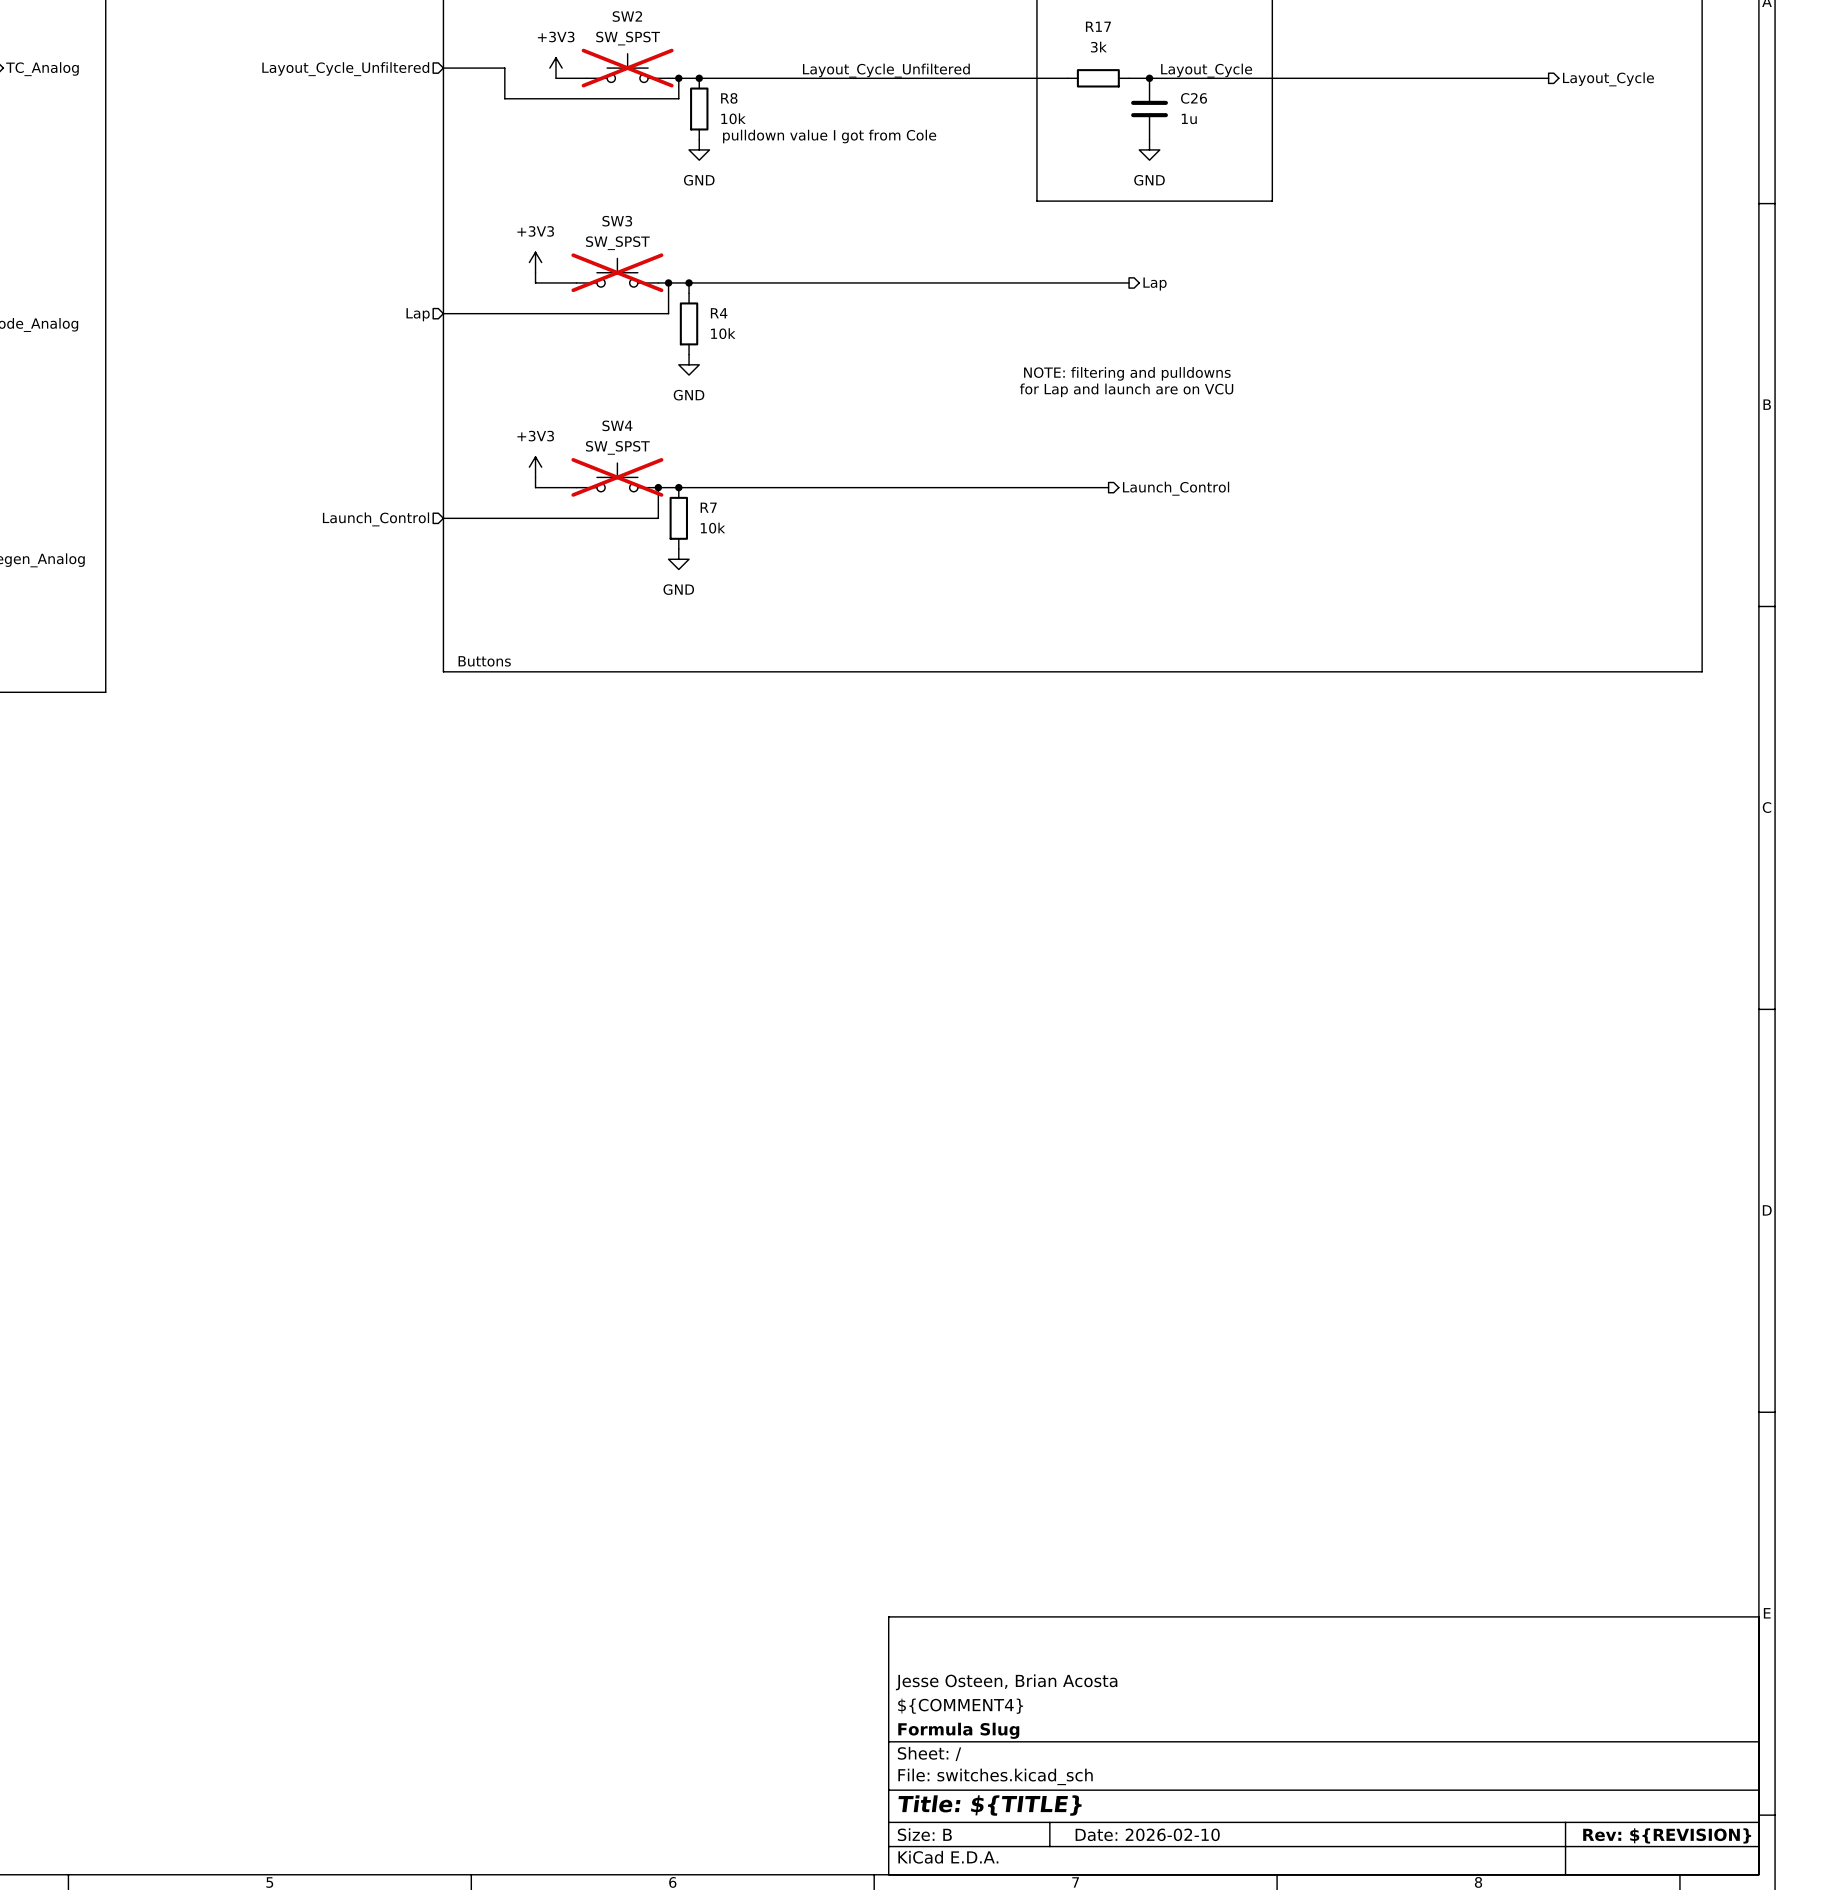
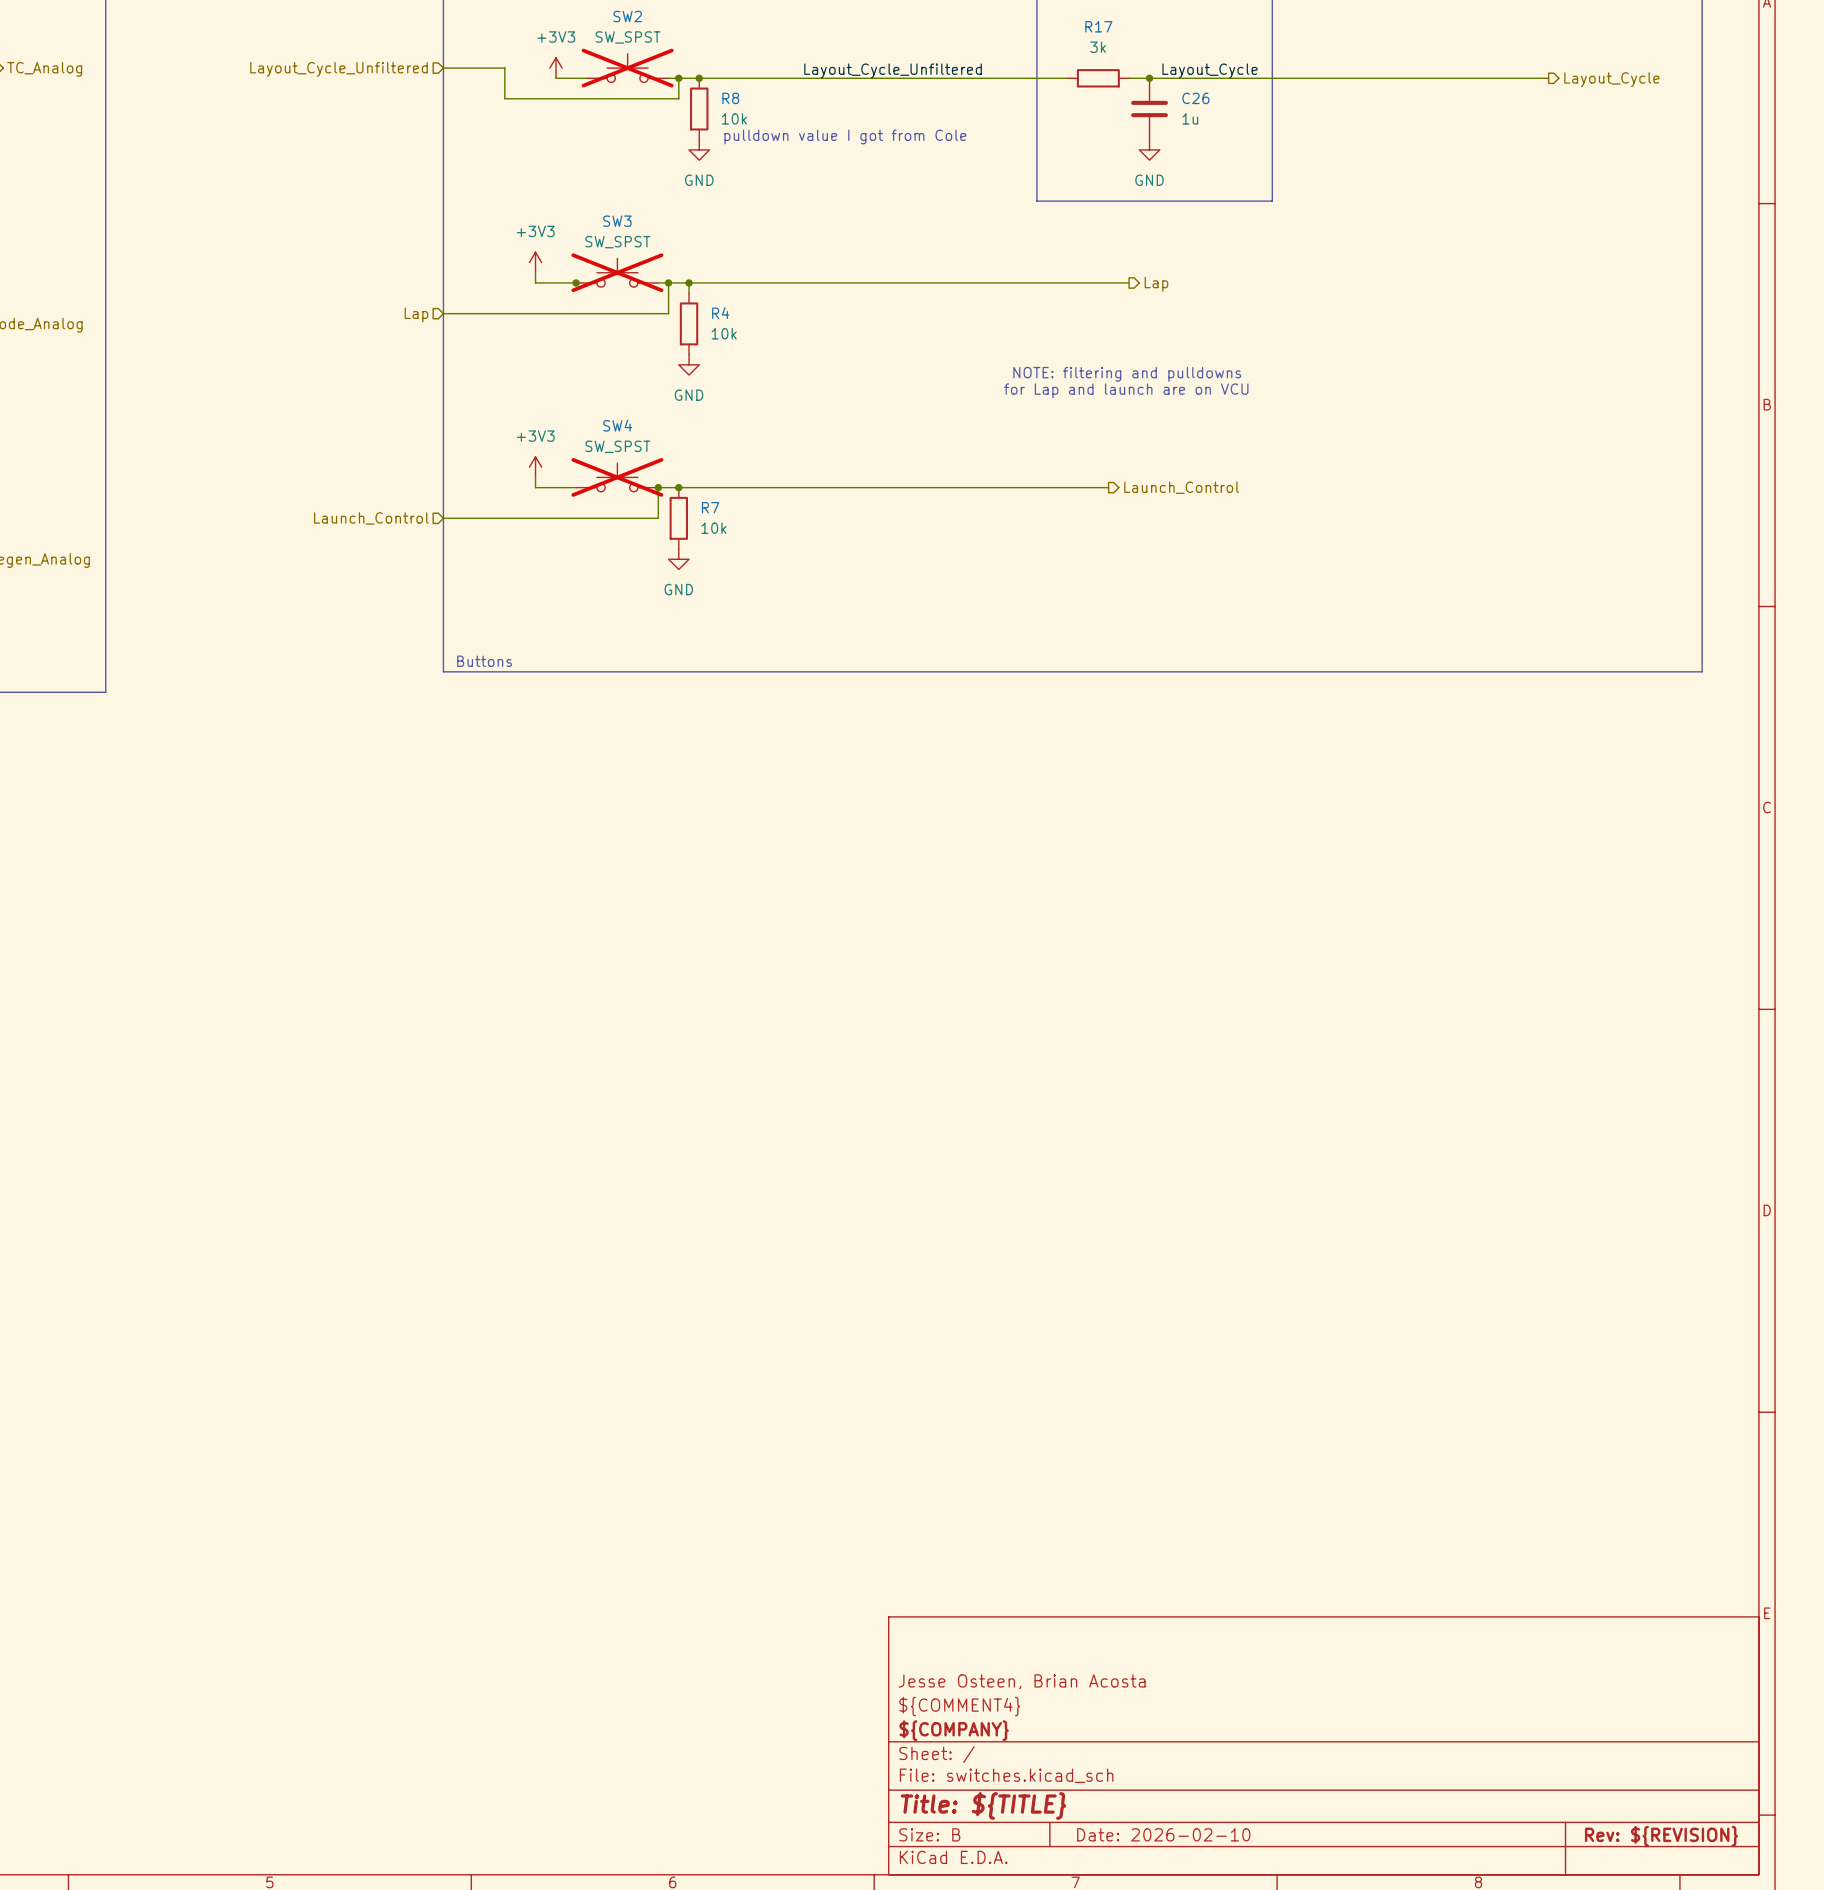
junction: none -> (576, 282)
title block: Formula Slug (958, 1730) -> ${COMPANY} (954, 1730)

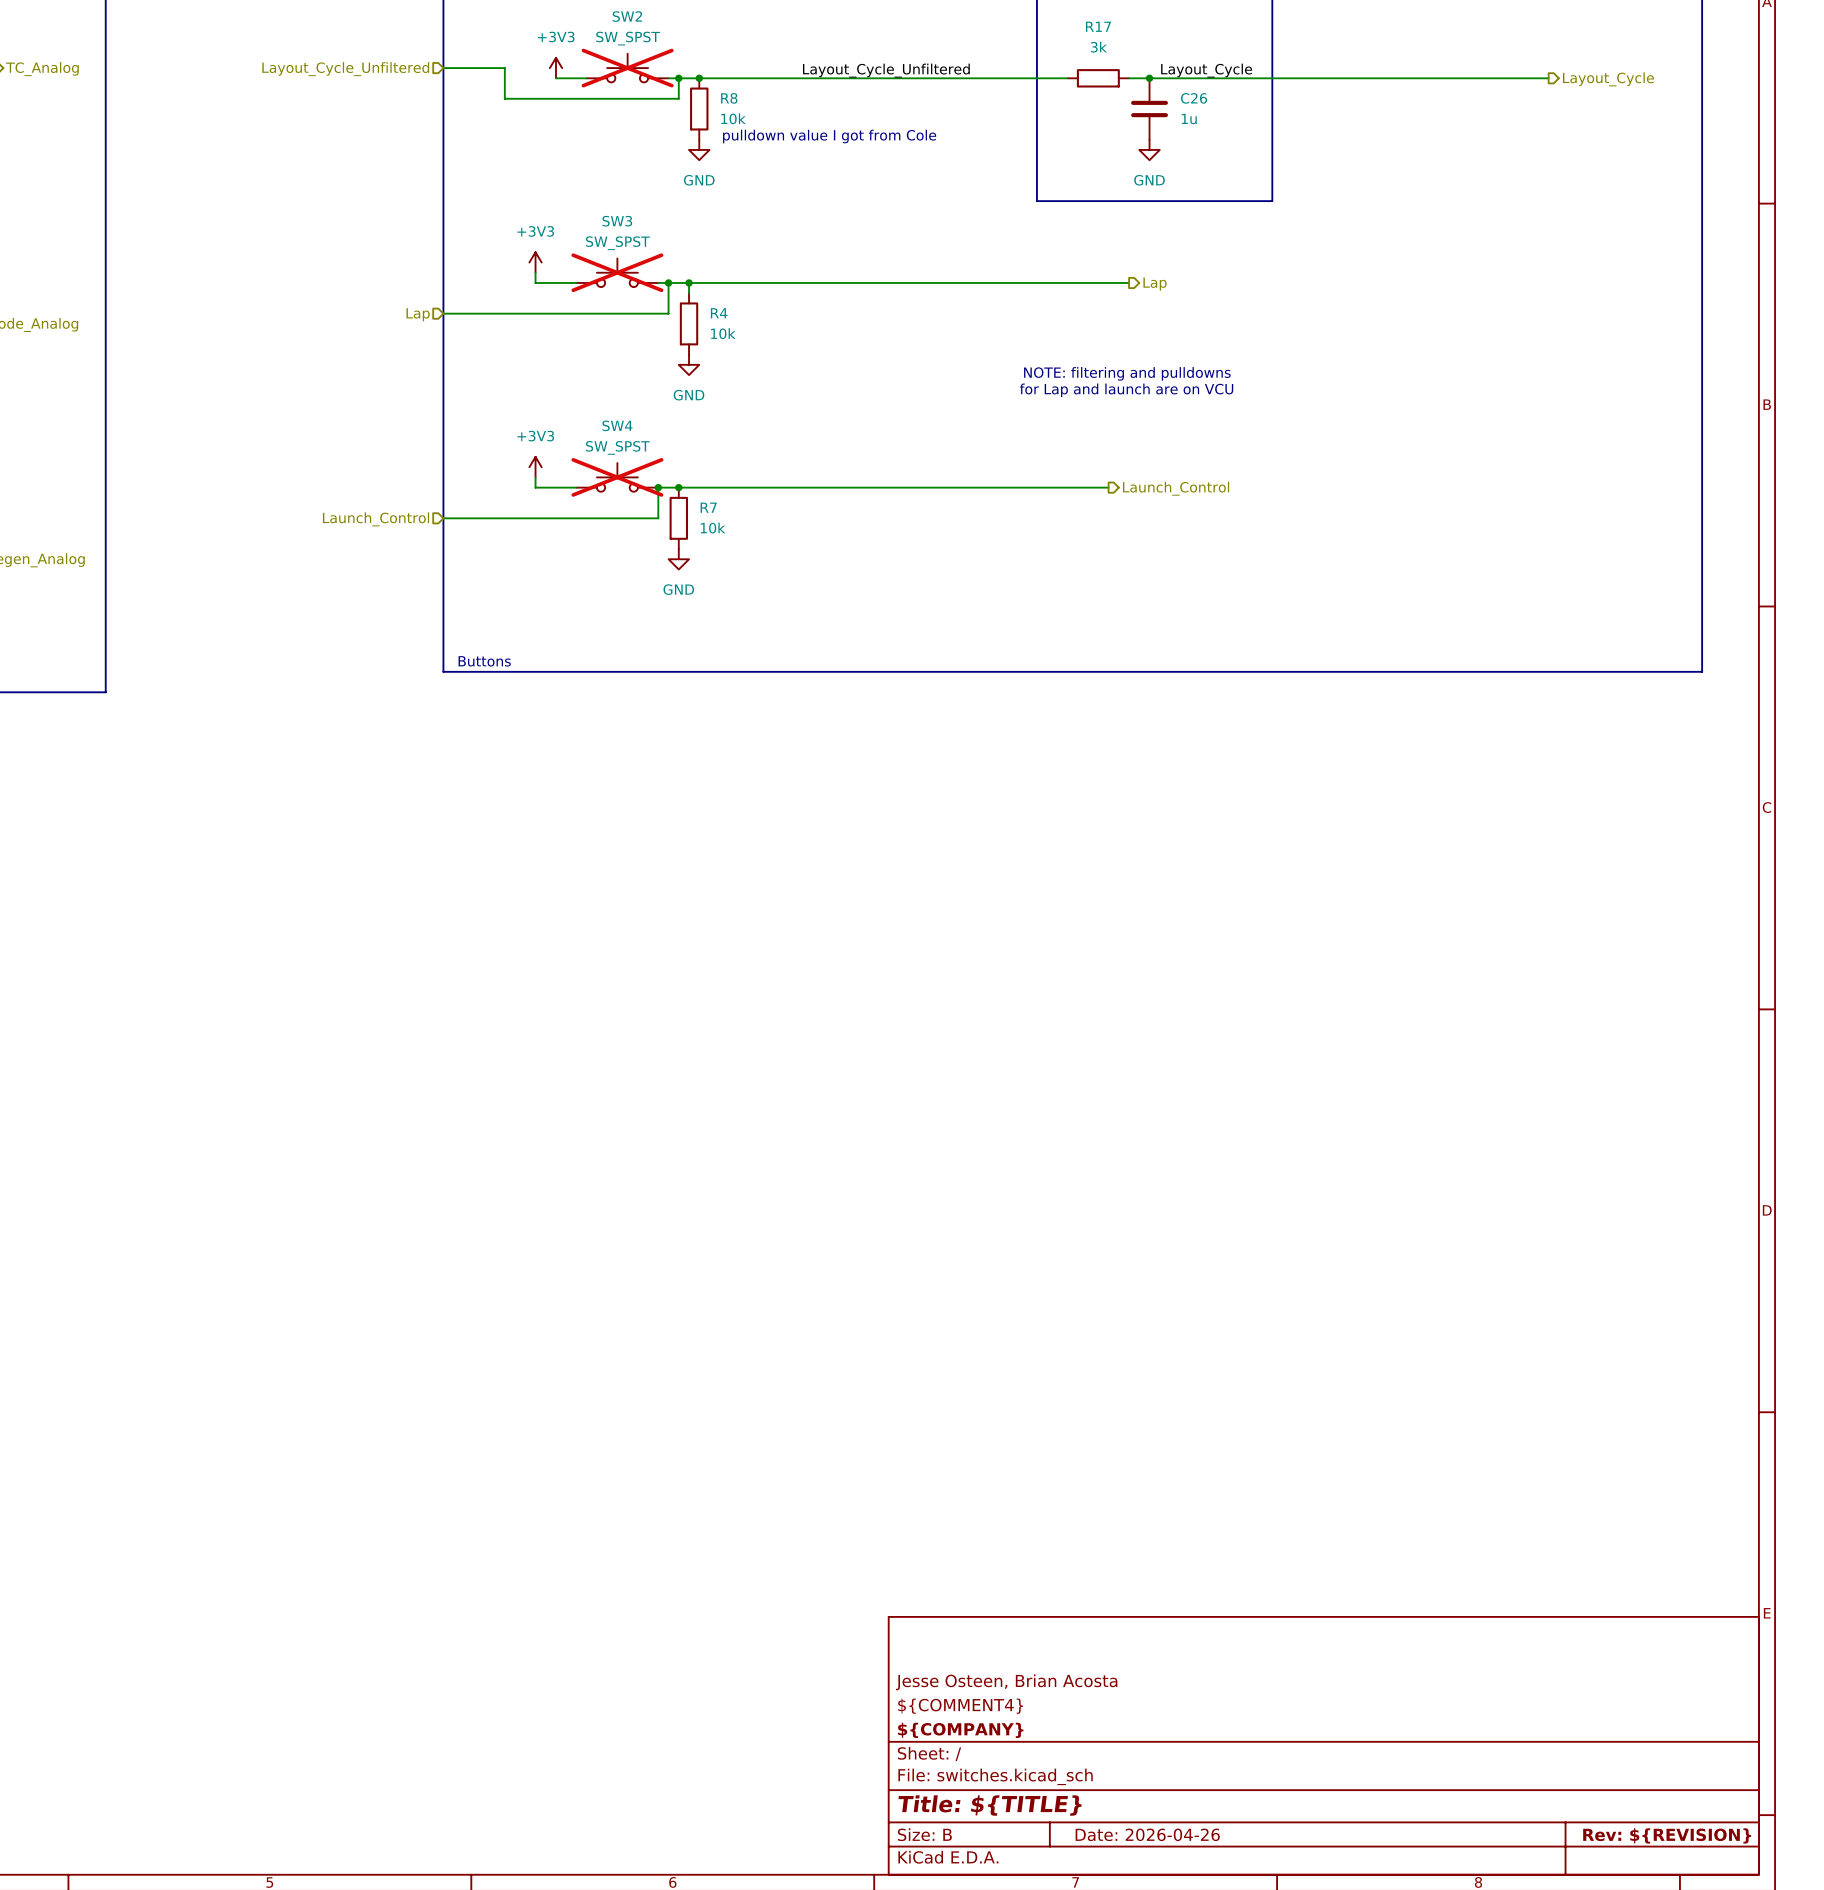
junction: (576, 282) -> none
title block: Date: 2026-02-10 (1163, 1834) -> Date: 2026-04-26 (1147, 1834)

